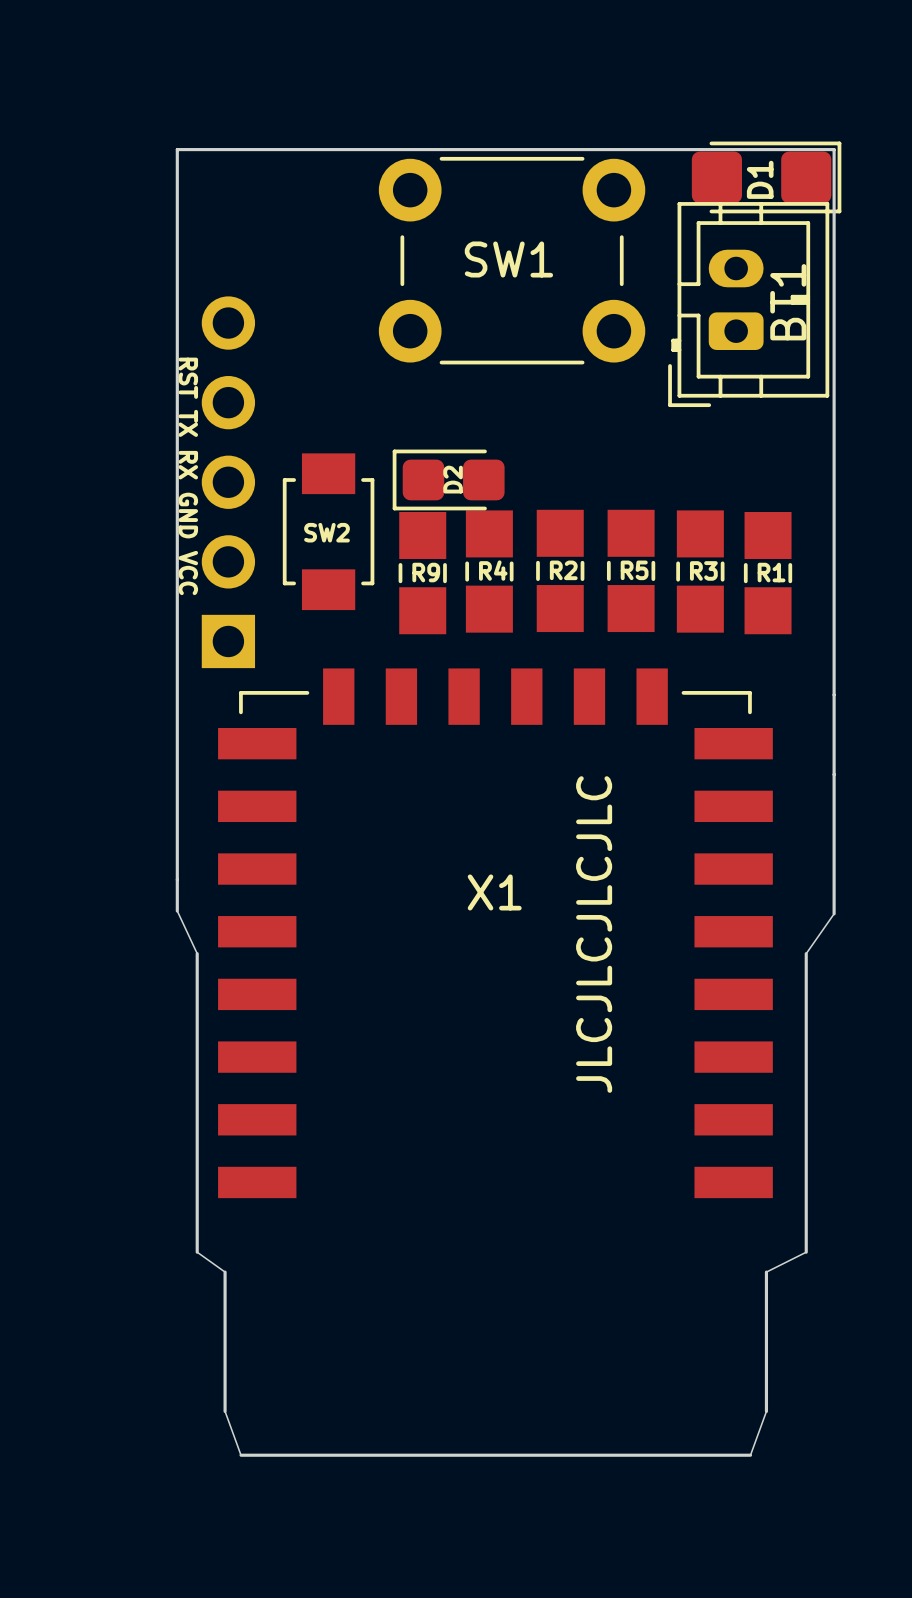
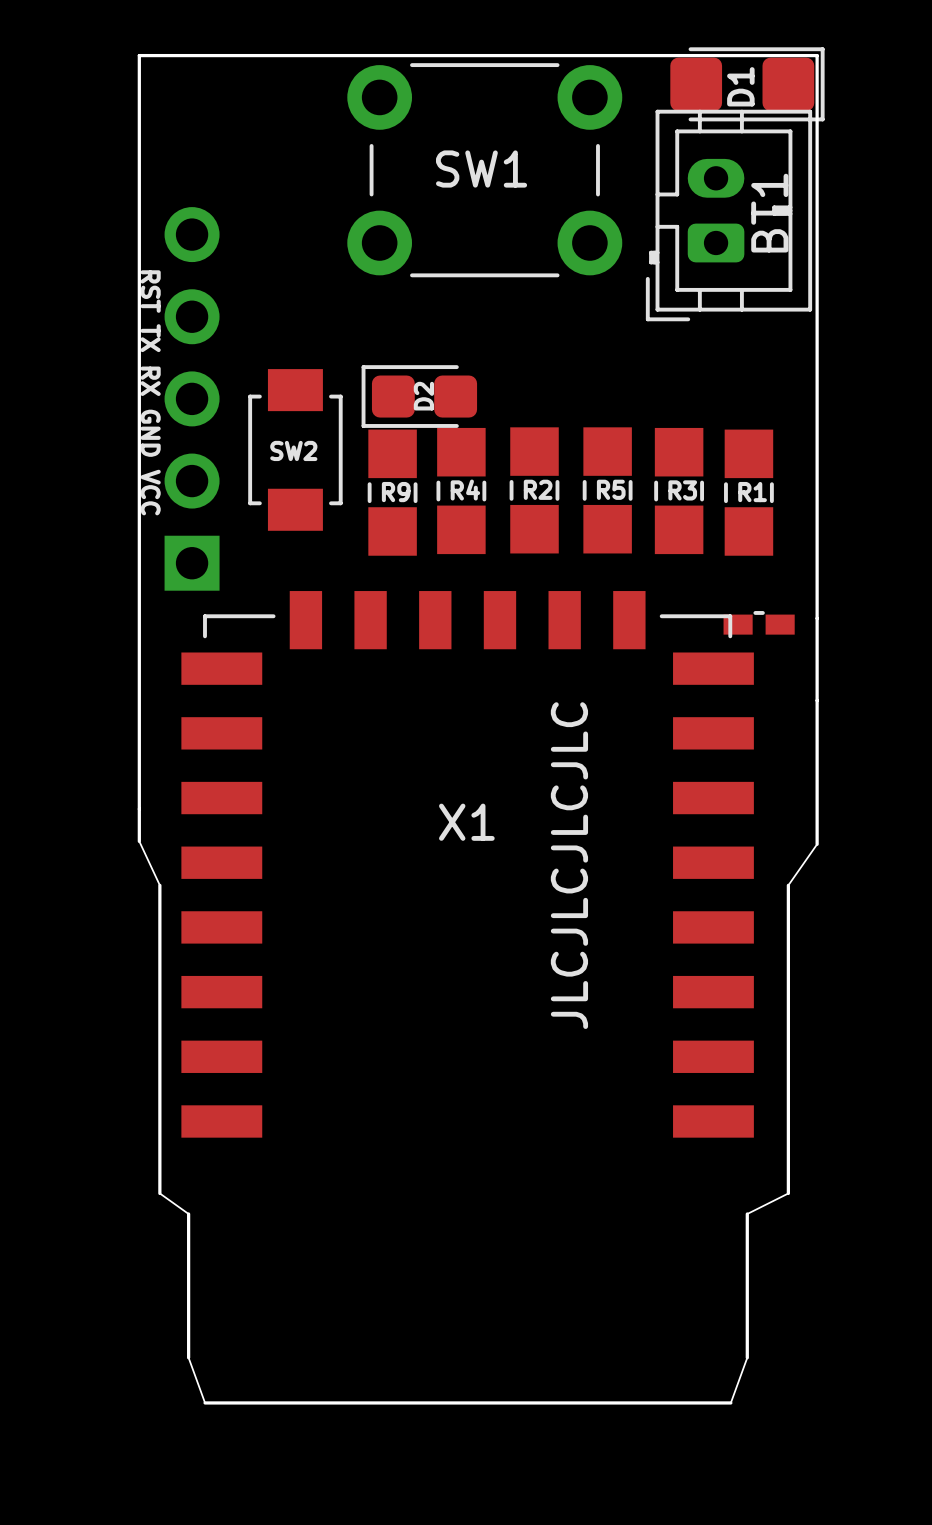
part: none -> (759, 622)

